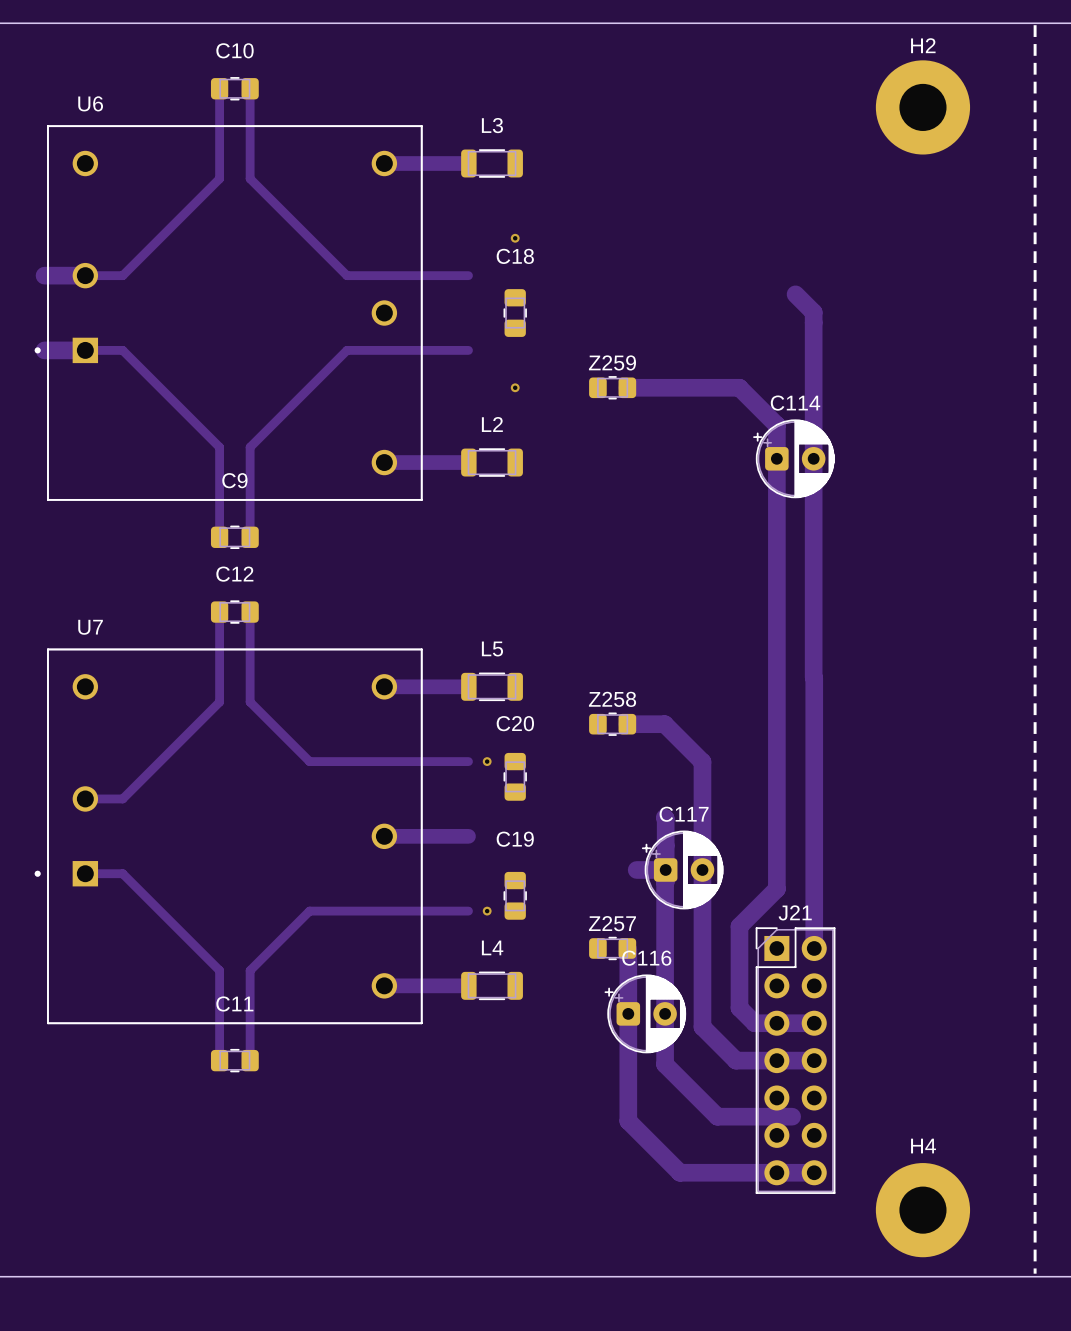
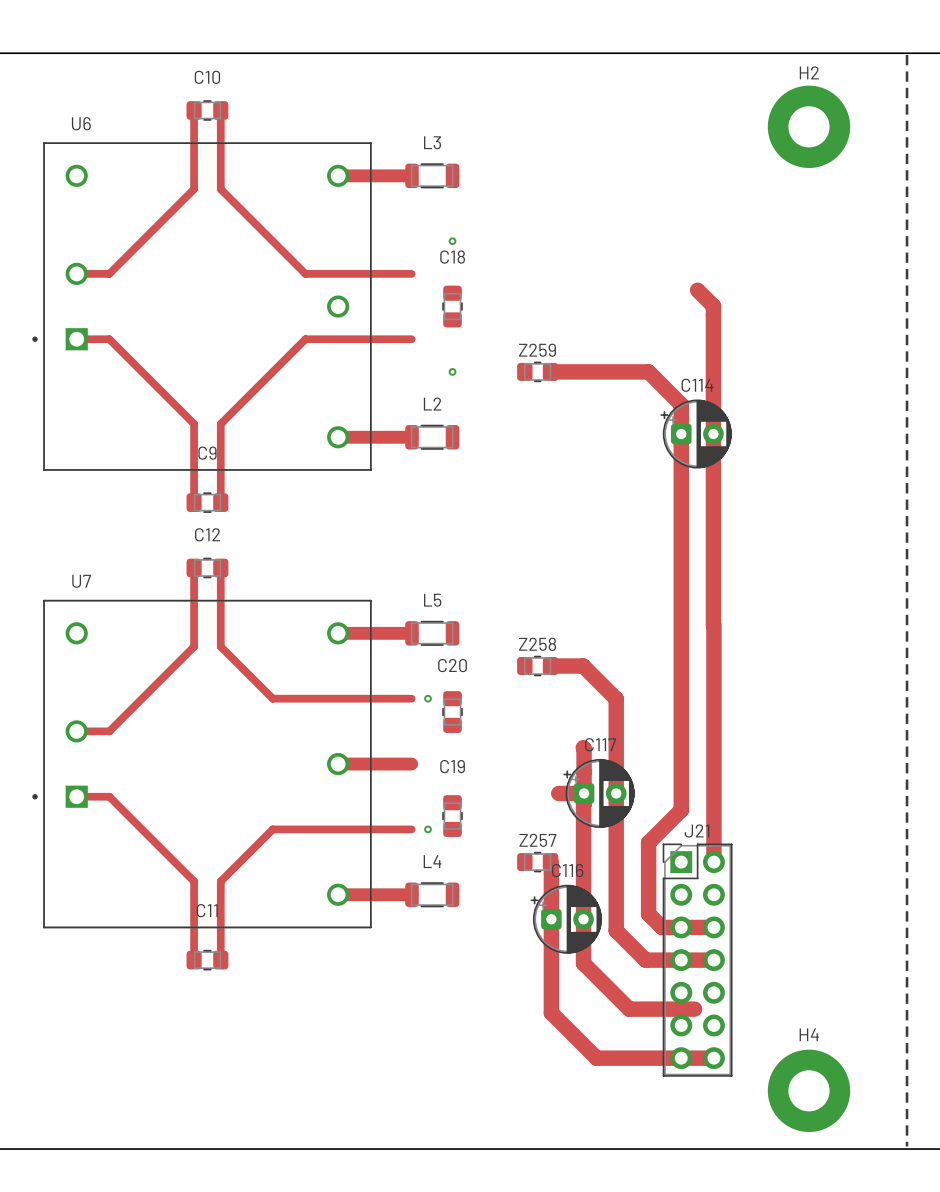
track: (44, 275) (85, 275) -> none
track: (44, 350) (85, 350) -> none

